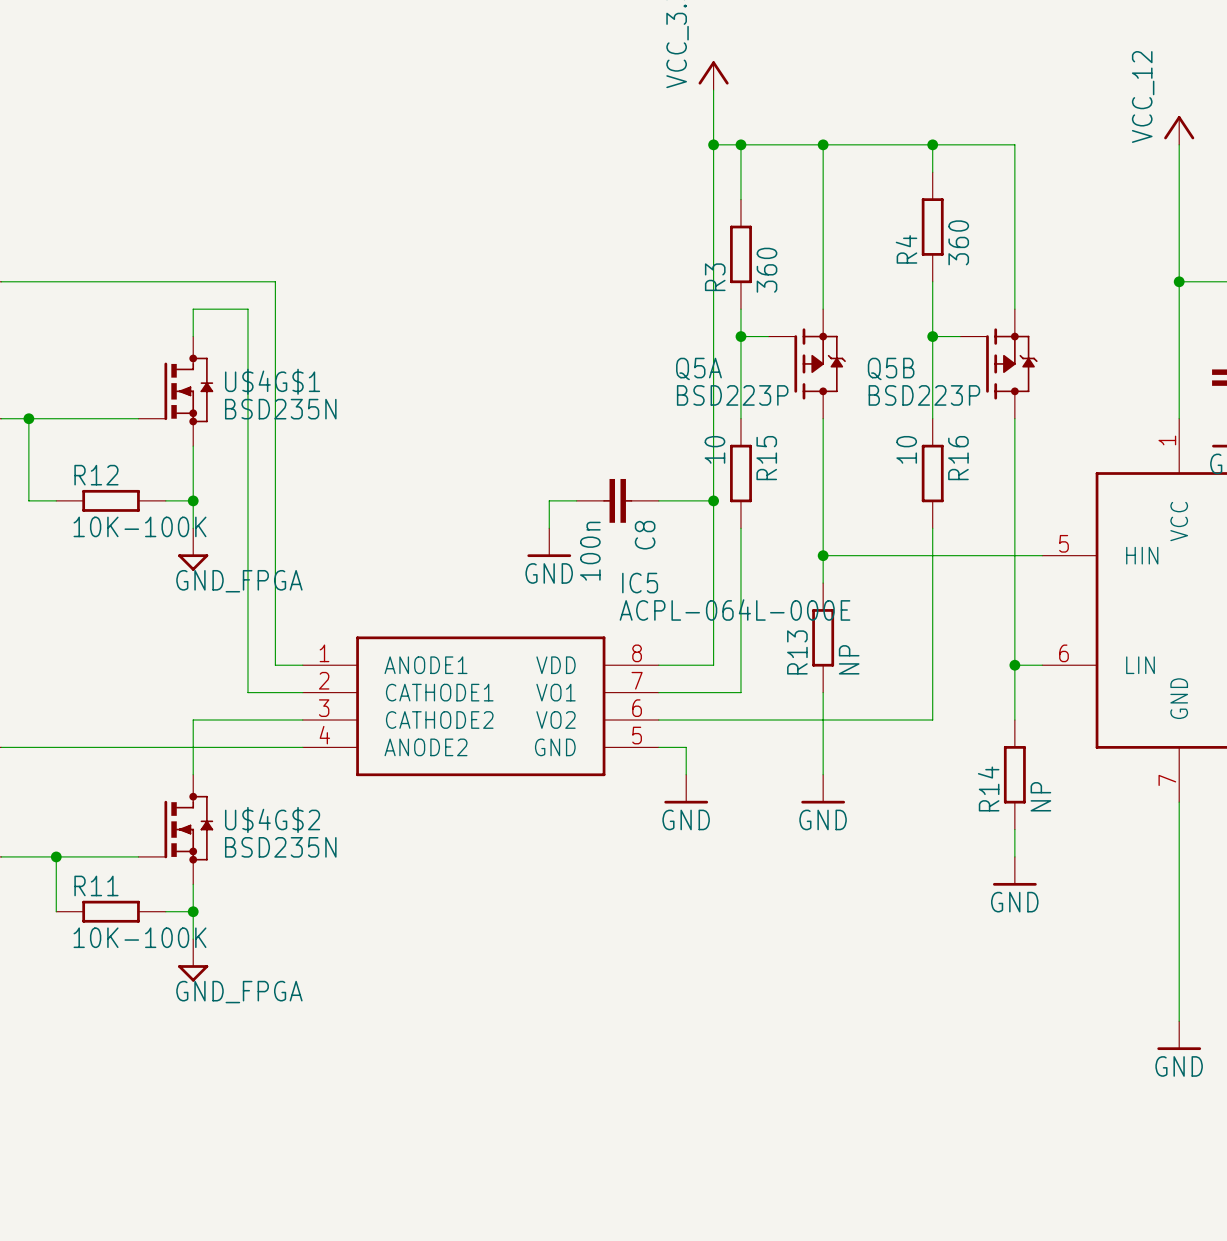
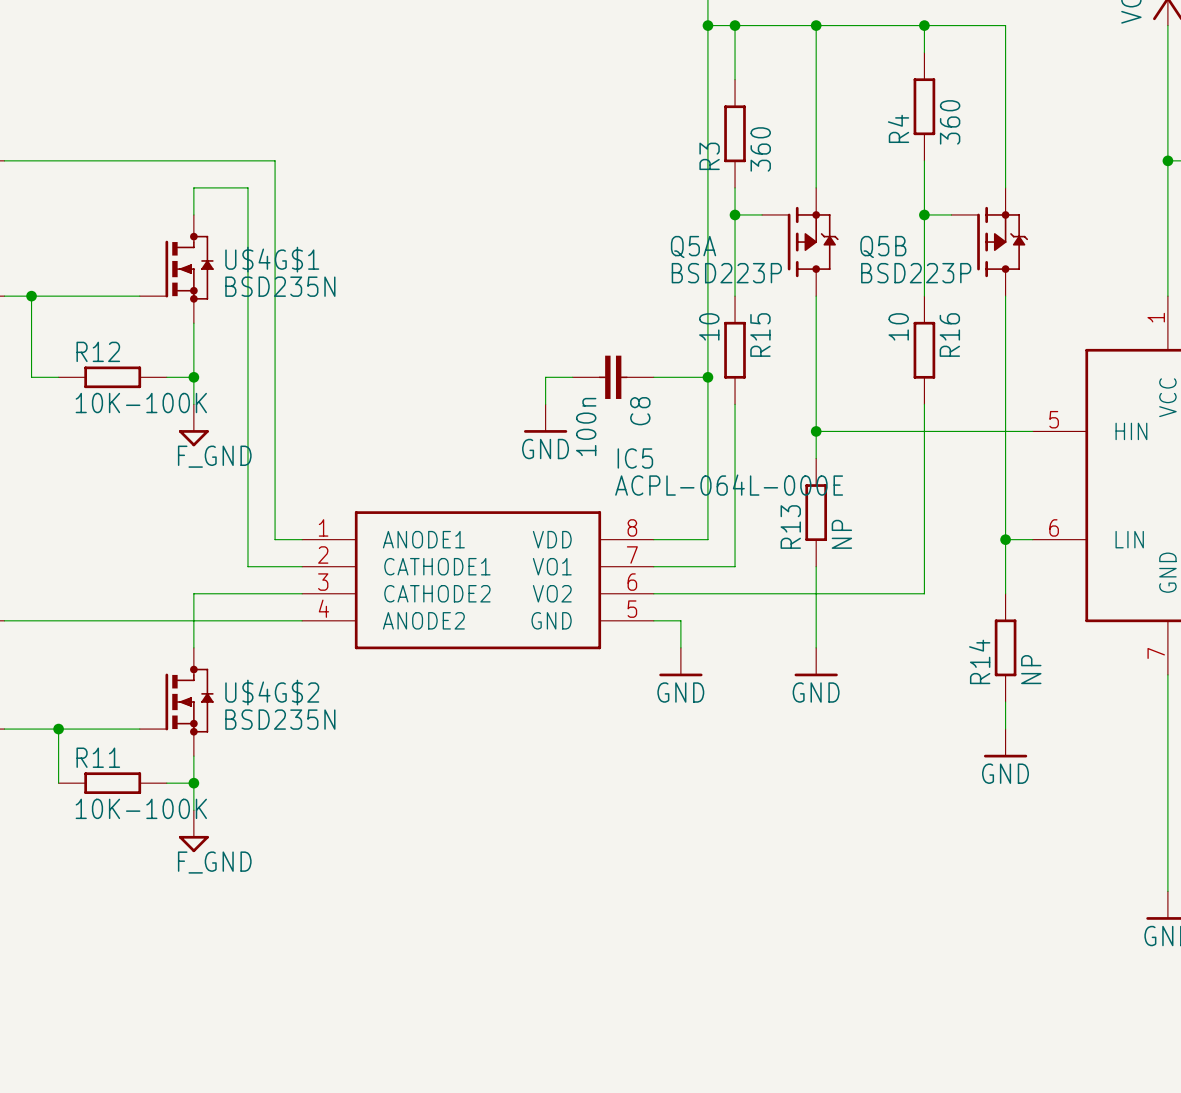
power symbol: GND_FPGA (193, 549) -> F_GND (193, 425)
power symbol: GND_FPGA (193, 960) -> F_GND (193, 831)

